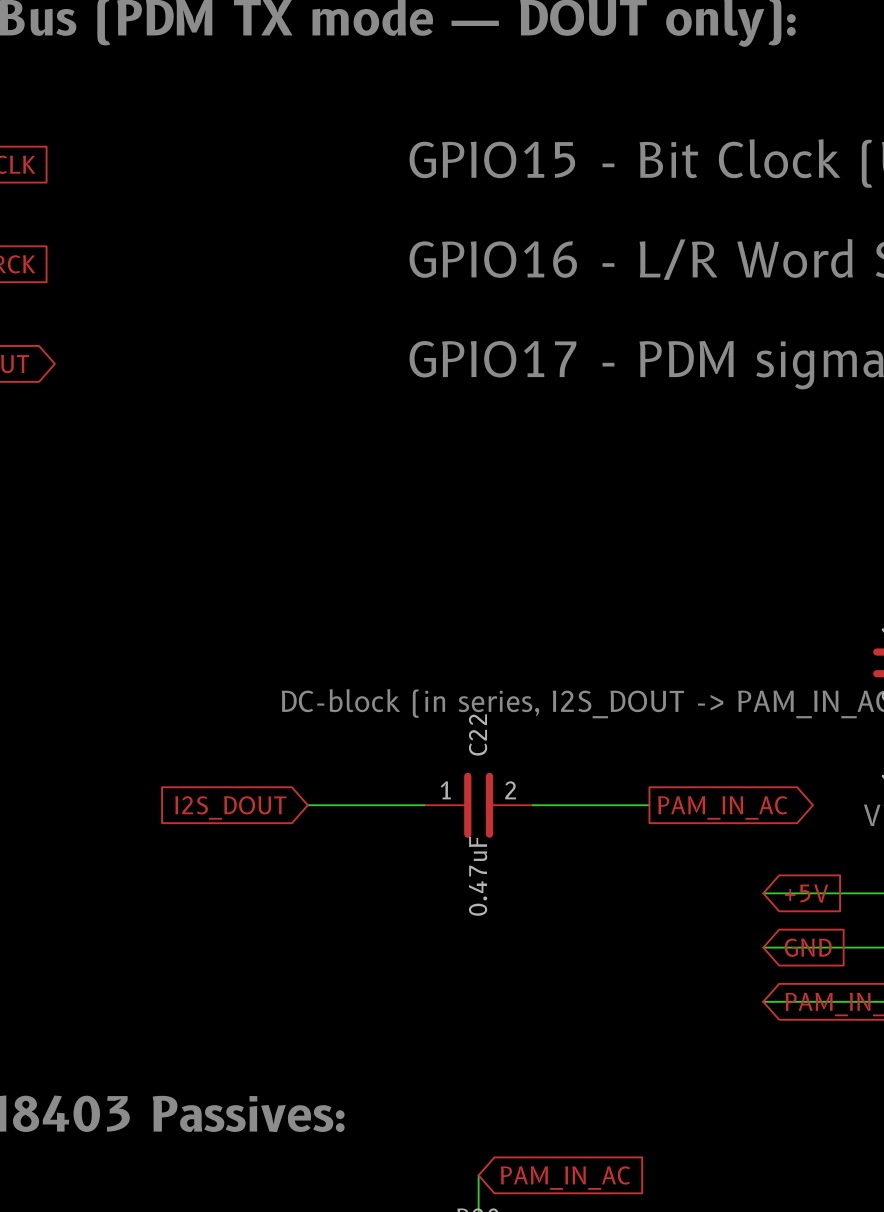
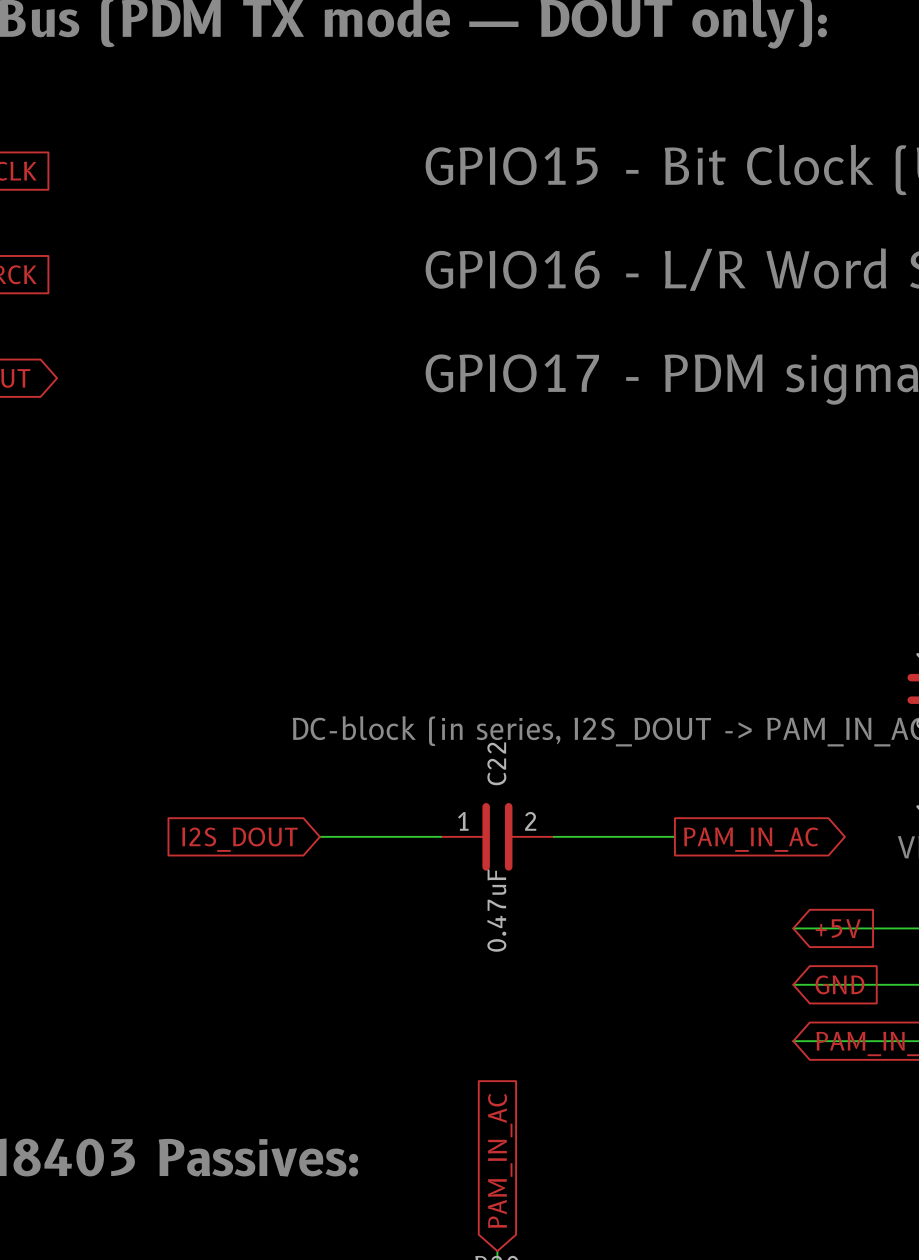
wire: (478, 1175) (478, 1203) -> none
global label rotation: 0° (565, 1178) -> 90° counterclockwise (500, 1160)

